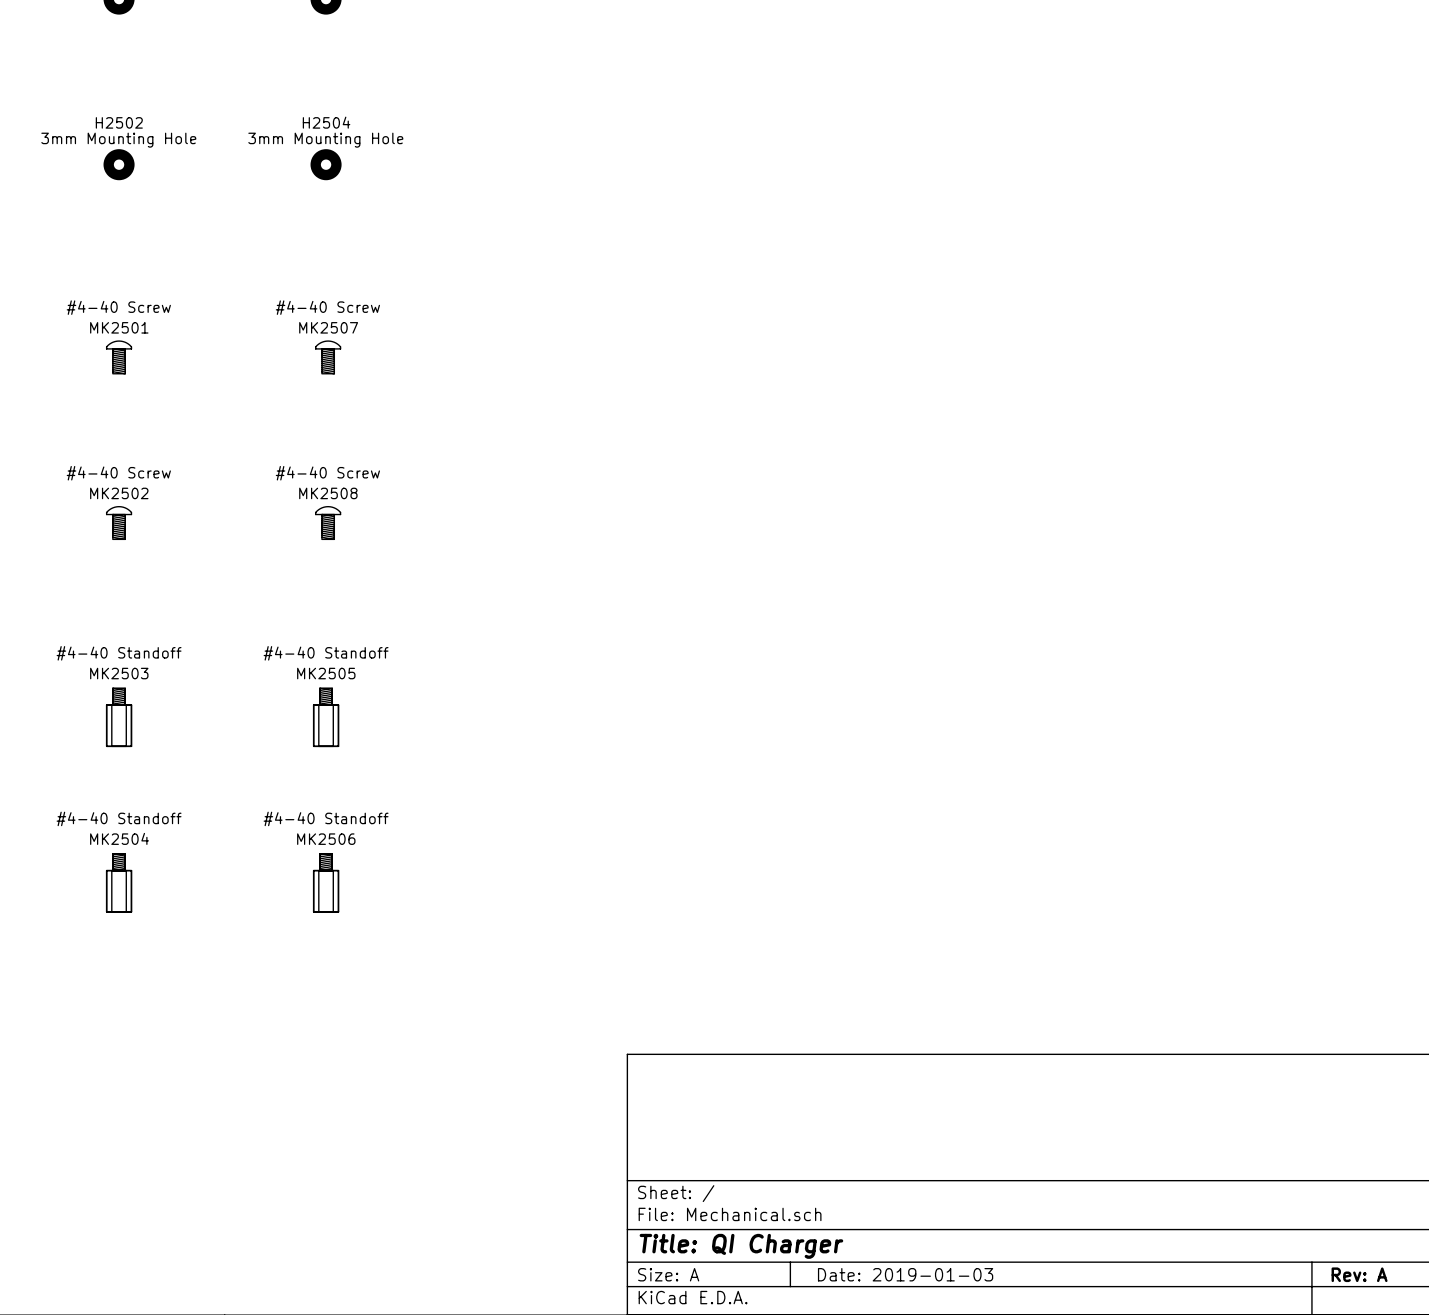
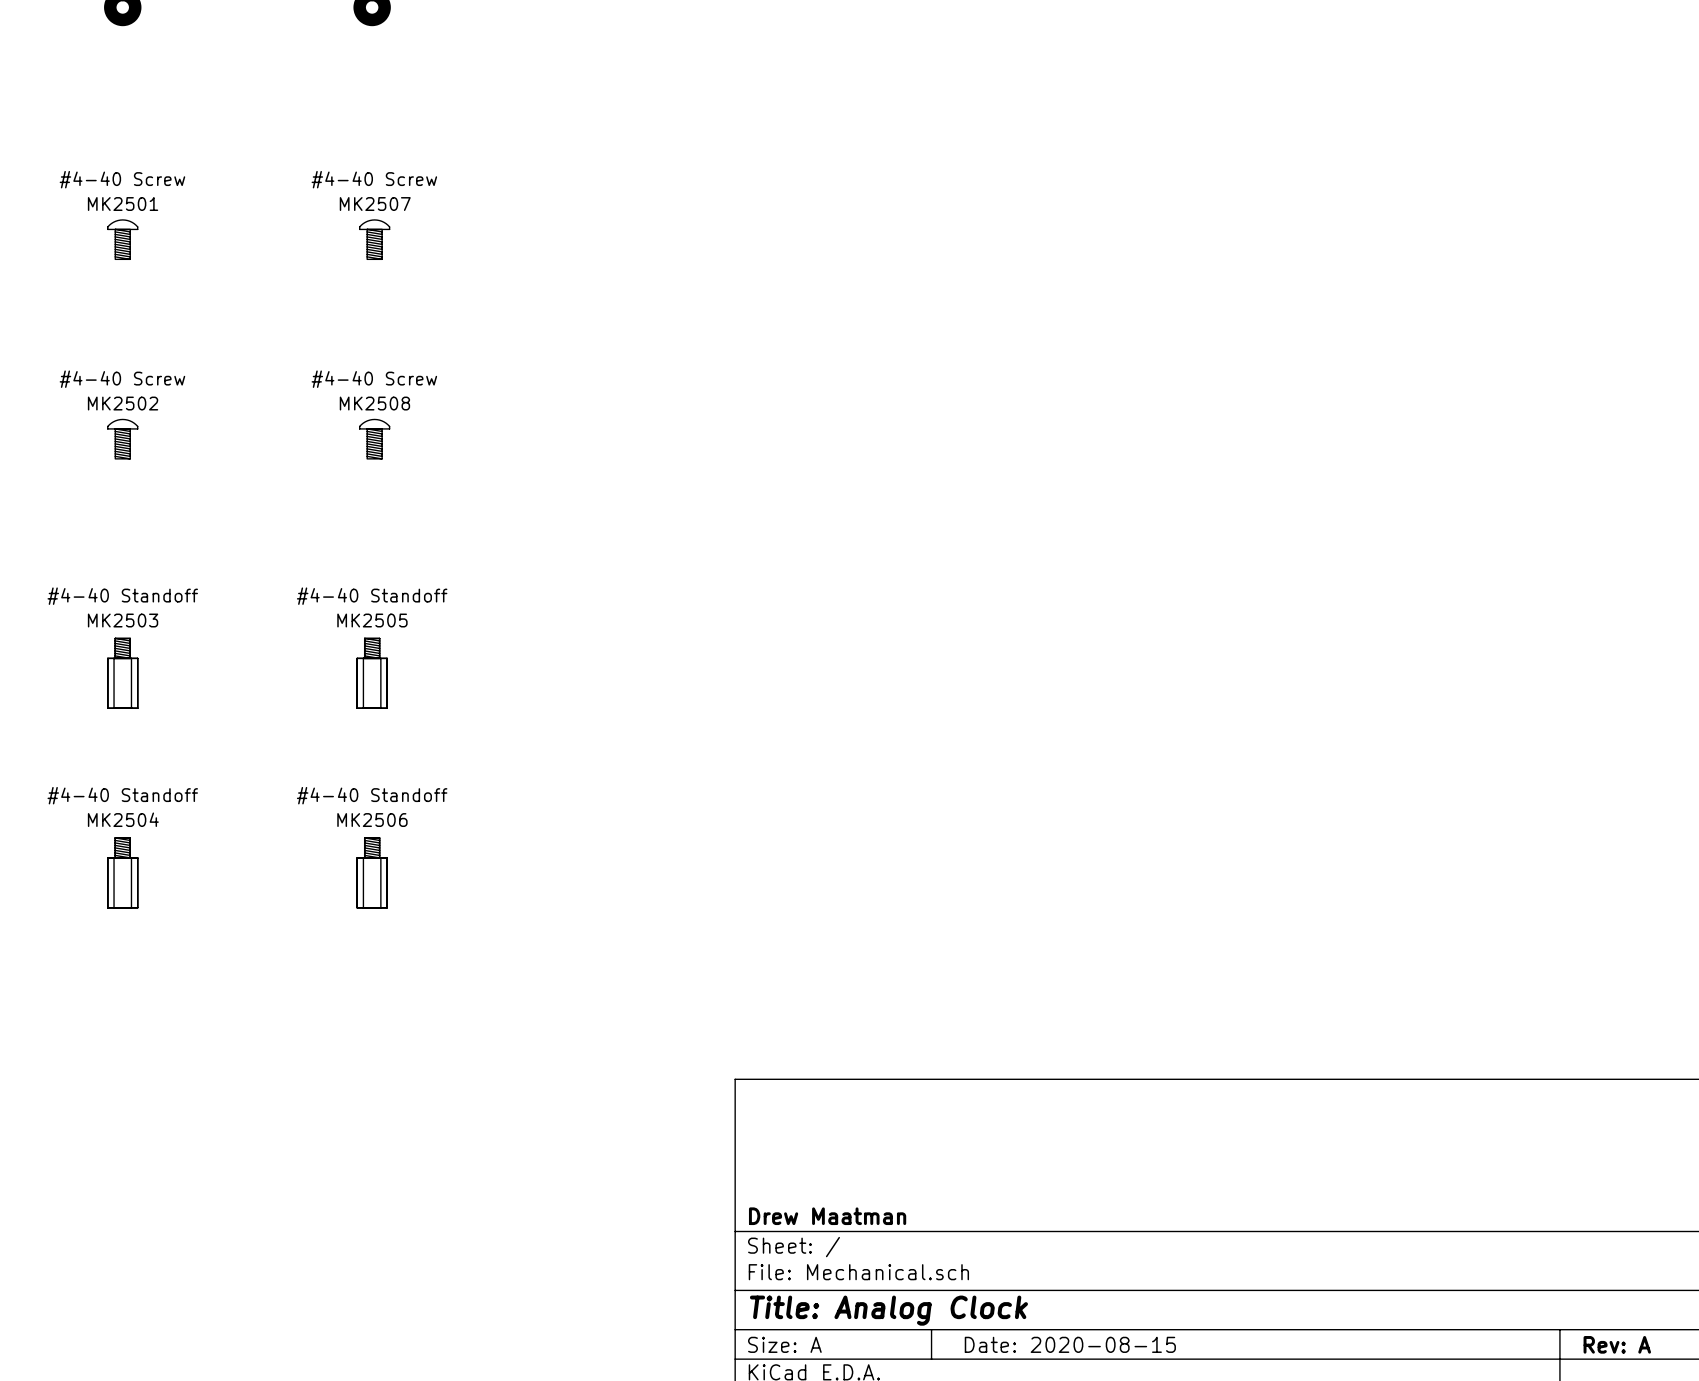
title block: none -> Drew Maatman (827, 1216)
title block: Title: QI Charger (741, 1246) -> Title: Analog Clock (888, 1310)
title block: Date: 2019-01-03 (905, 1274) -> Date: 2020-08-15 (1070, 1344)

